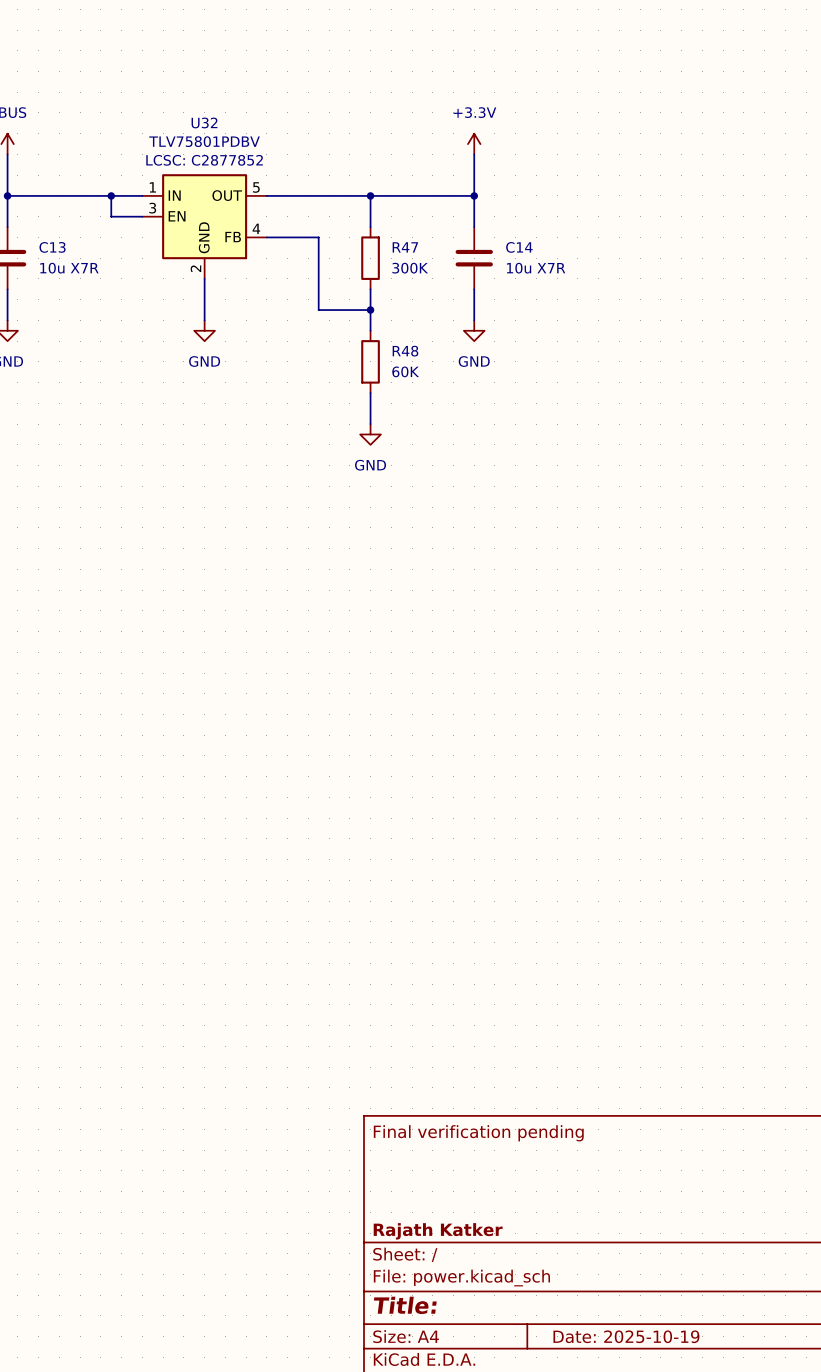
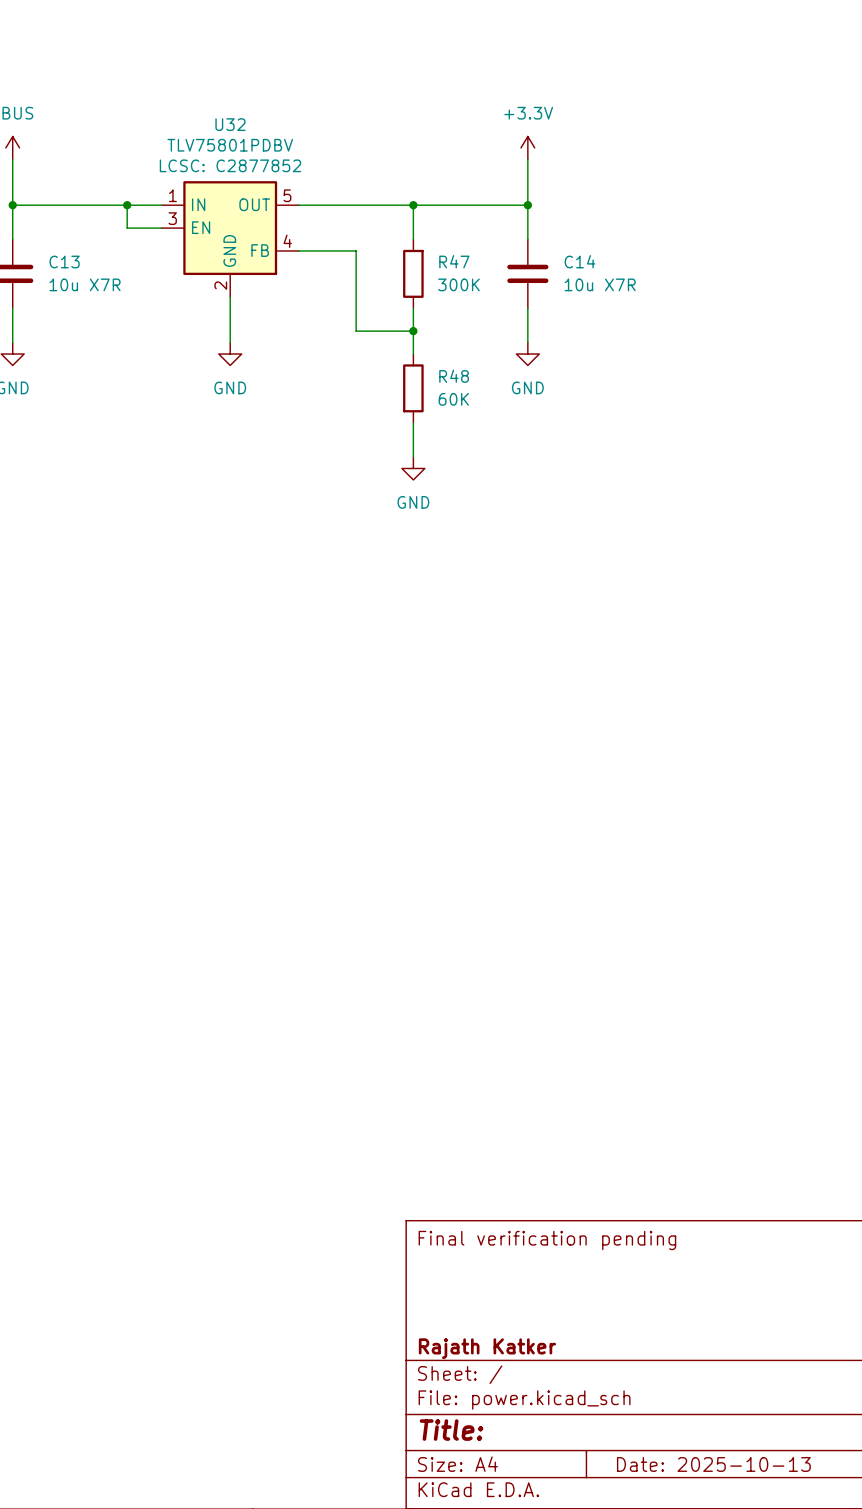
title block: Date: 2025-10-19 (626, 1336) -> Date: 2025-10-13 (713, 1464)

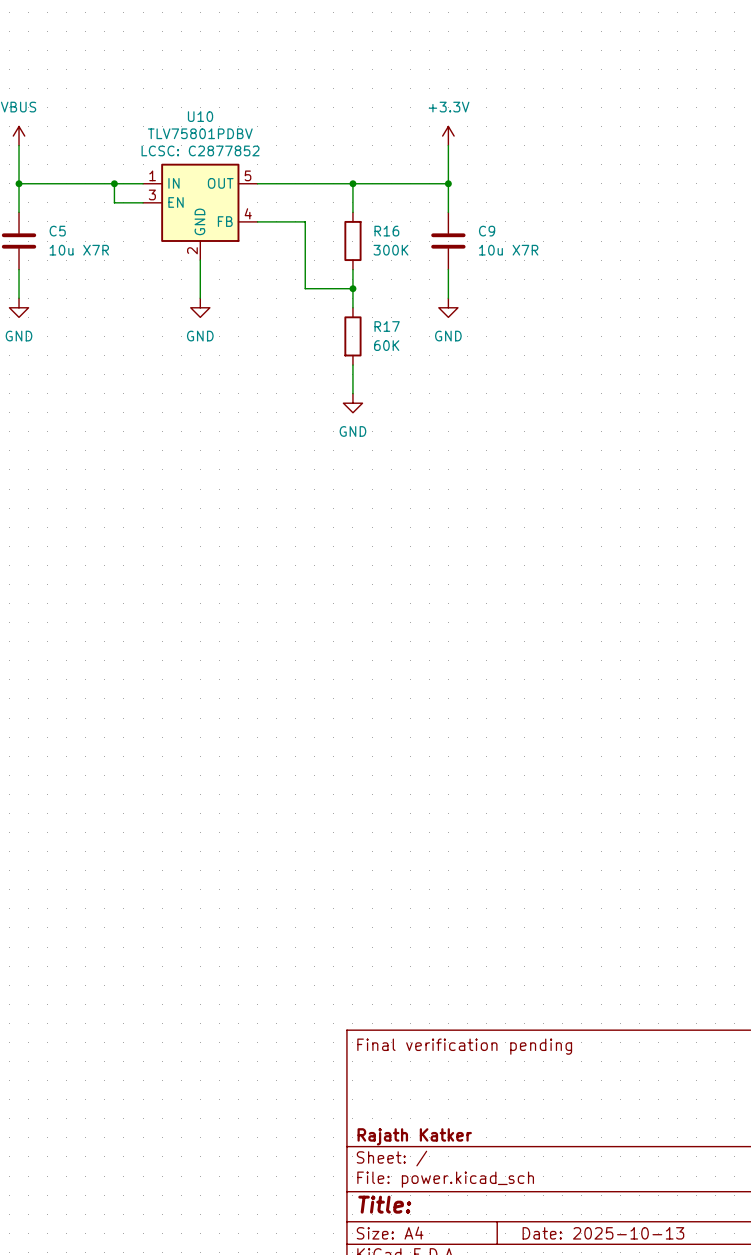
U32 name: U32 (230, 124) -> U10 (200, 116)
R47 name: R47 (454, 261) -> R16 (386, 231)
C14 name: C14 (580, 261) -> C9 (487, 231)
C13 name: C13 (64, 262) -> C5 (57, 231)
R48 name: R48 (454, 376) -> R17 (387, 326)

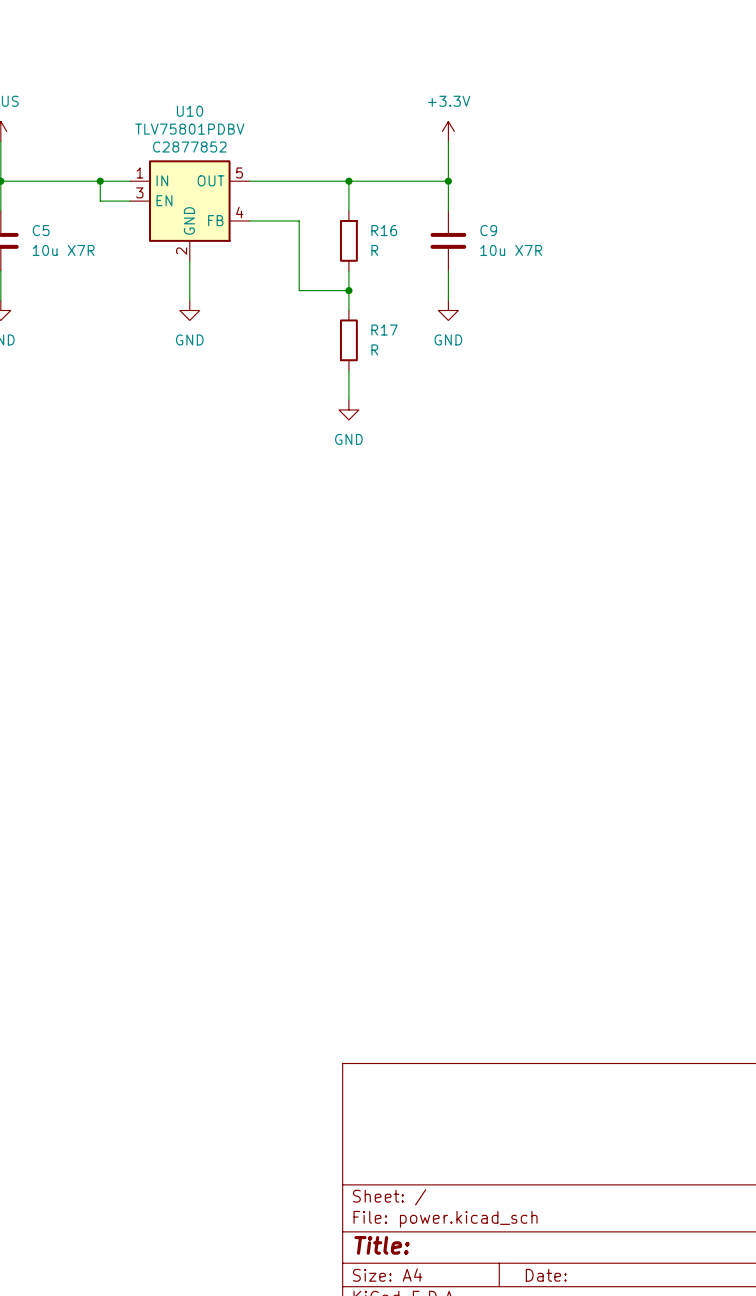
U10 text: LCSC: C2877852 (200, 150) -> C2877852 (189, 147)
R16 value: 300K (390, 250) -> R (374, 250)
R17 value: 60K (386, 345) -> R (374, 349)
title block: Final verification pending (464, 1046) -> none
title block: Rajath Katker (414, 1136) -> none
title block: Date: 2025-10-13 (603, 1233) -> Date: (546, 1275)

